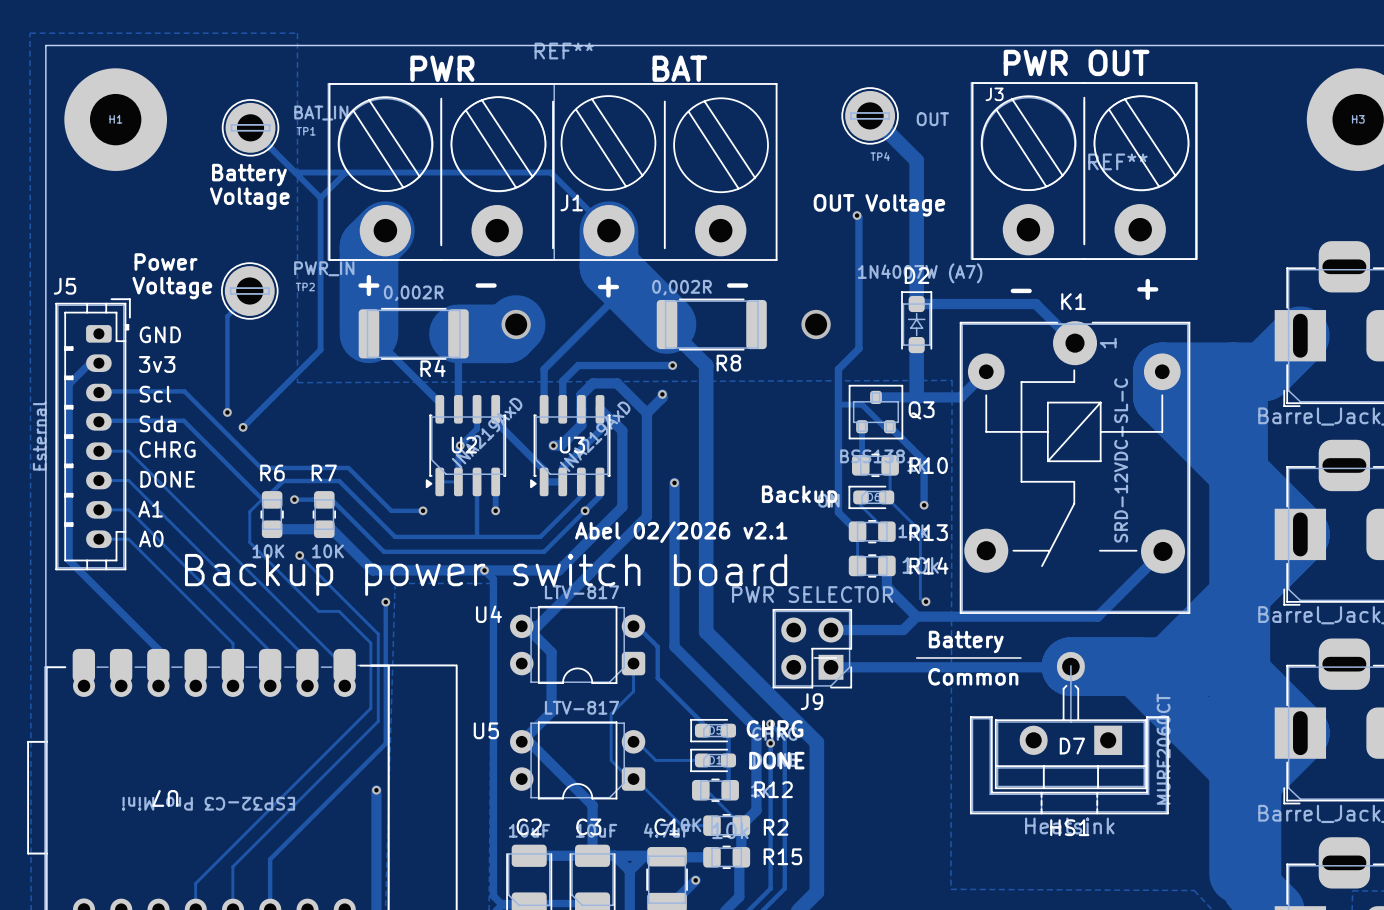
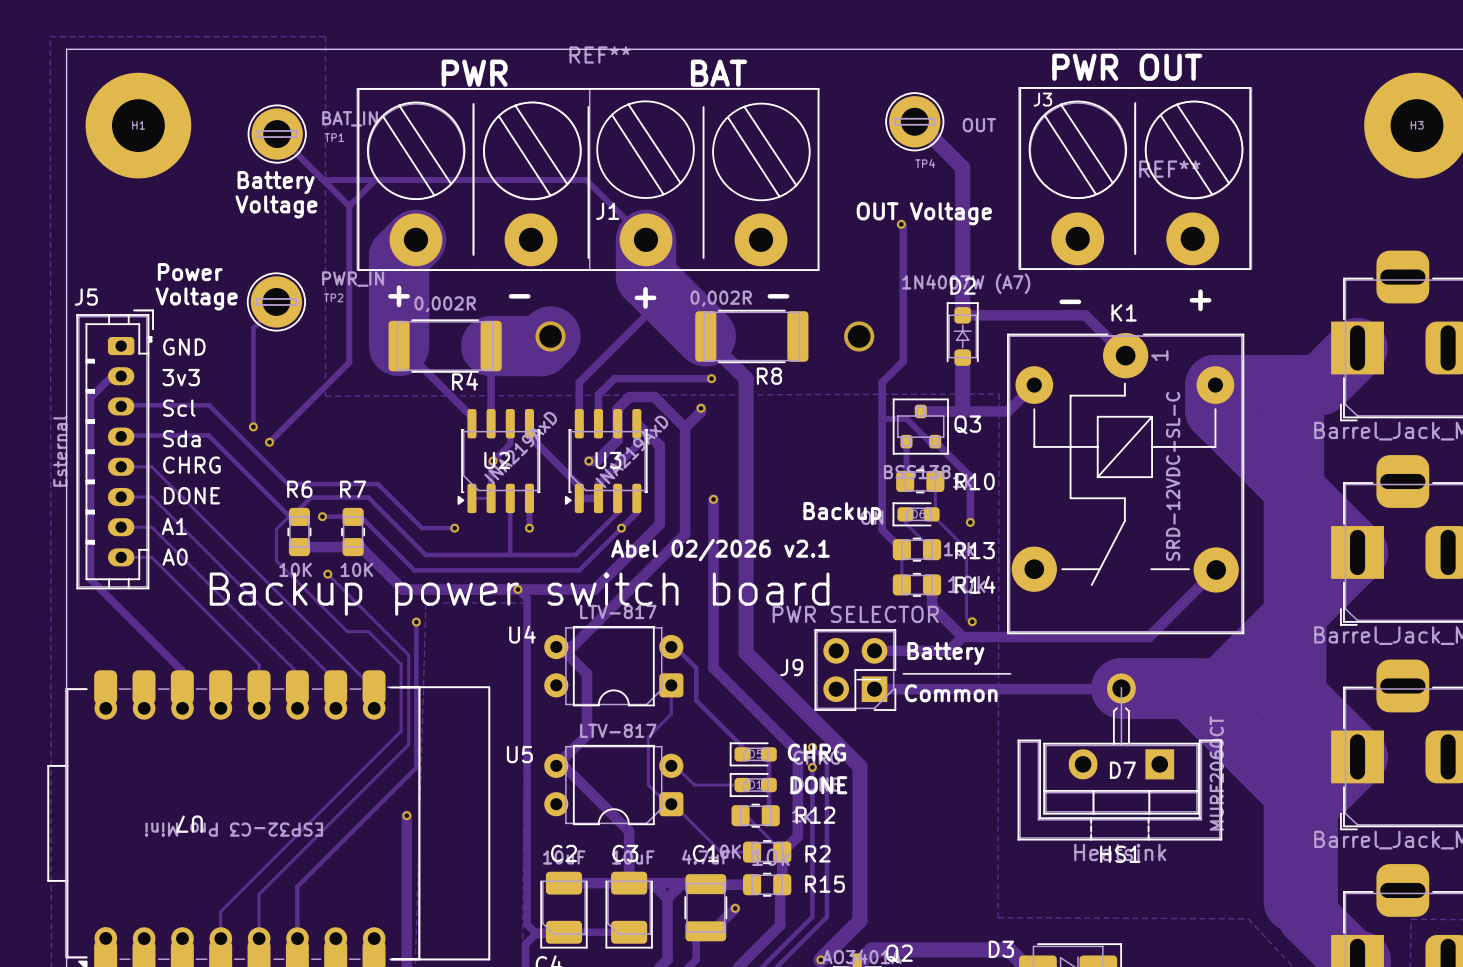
text position: Battery (966, 641) -> Battery (945, 653)
line: (916, 657) (1020, 657) -> (903, 673) (1010, 673)
text position: Common (973, 676) -> Common (951, 693)
J9 name position: J9 (812, 701) -> J9 (791, 667)

